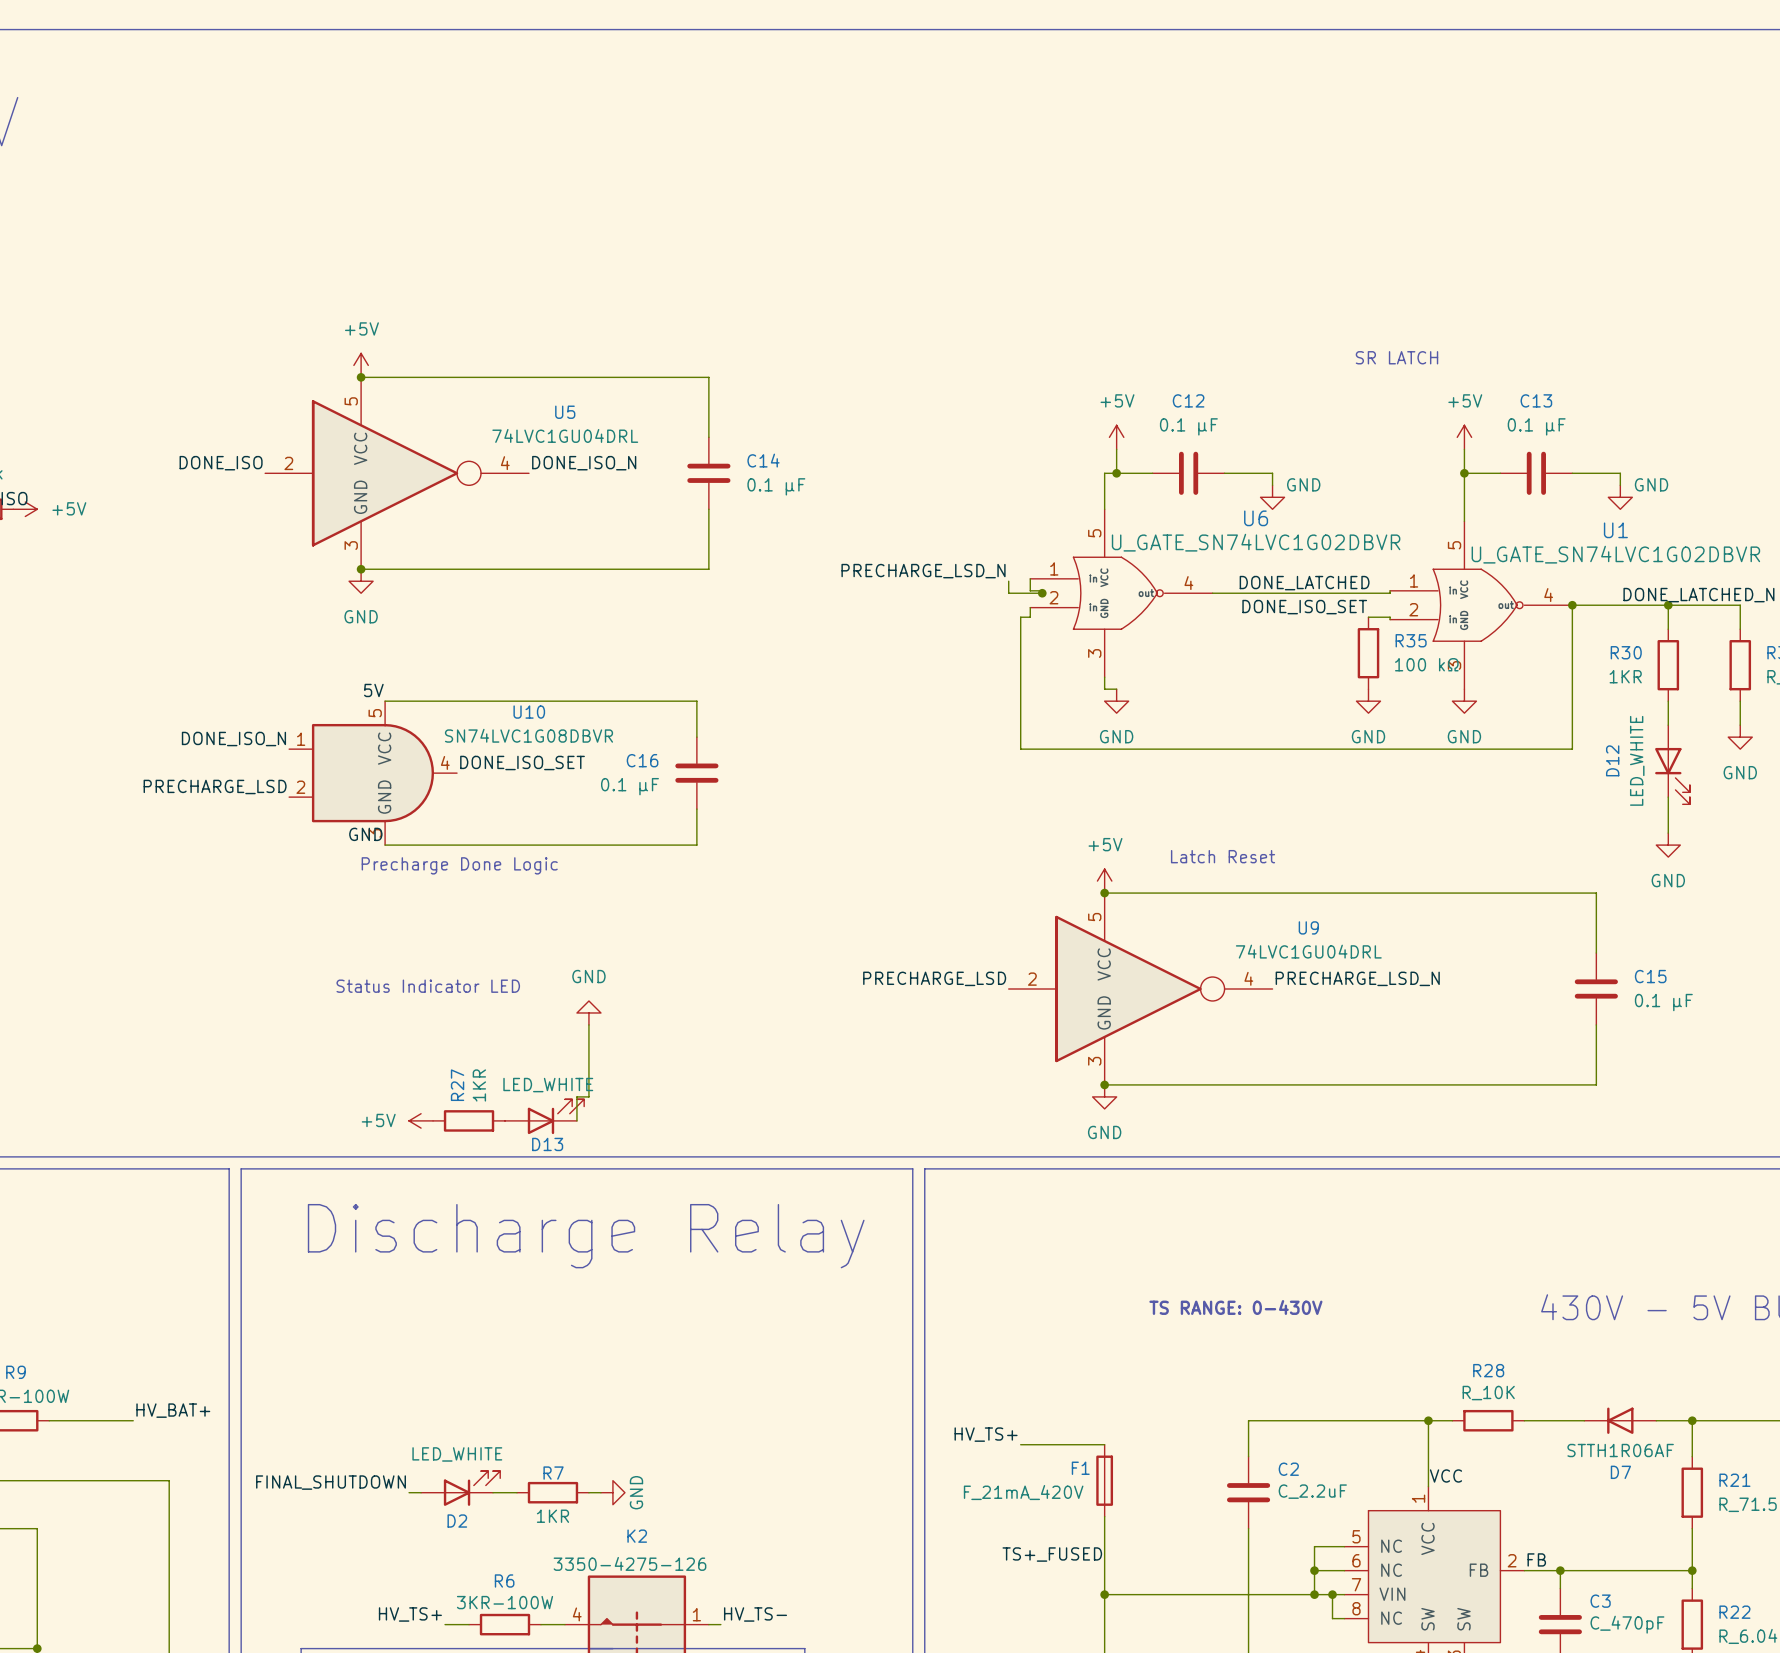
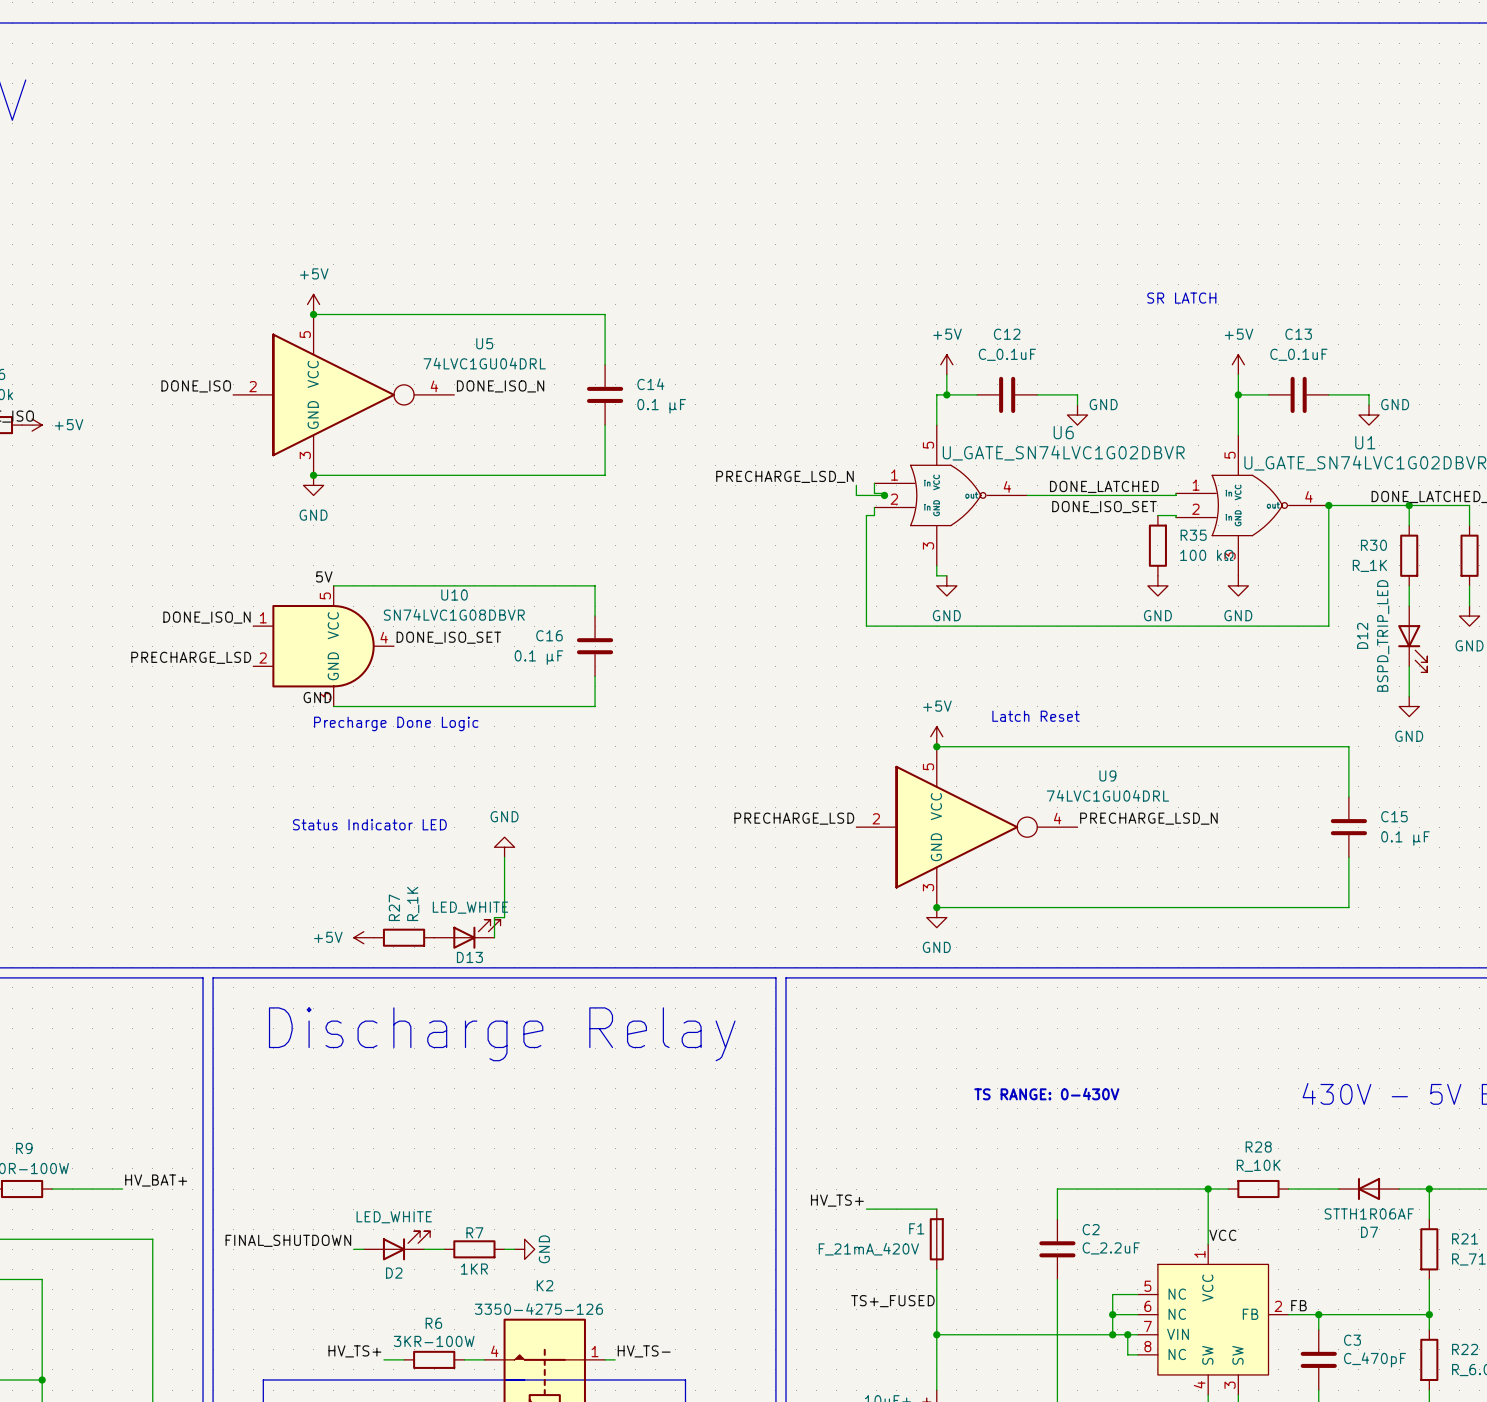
C12 value: 0.1 µF (1188, 426) -> C_0.1uF (1007, 354)
C13 value: 0.1 µF (1536, 426) -> C_0.1uF (1298, 354)
R30 value: 1KR (1625, 676) -> R_1K (1369, 565)
D12 value: LED_WHITE (1637, 760) -> BSPD_TRIP_LED (1383, 635)
R27 value: 1KR (479, 1085) -> R_1K (413, 903)

